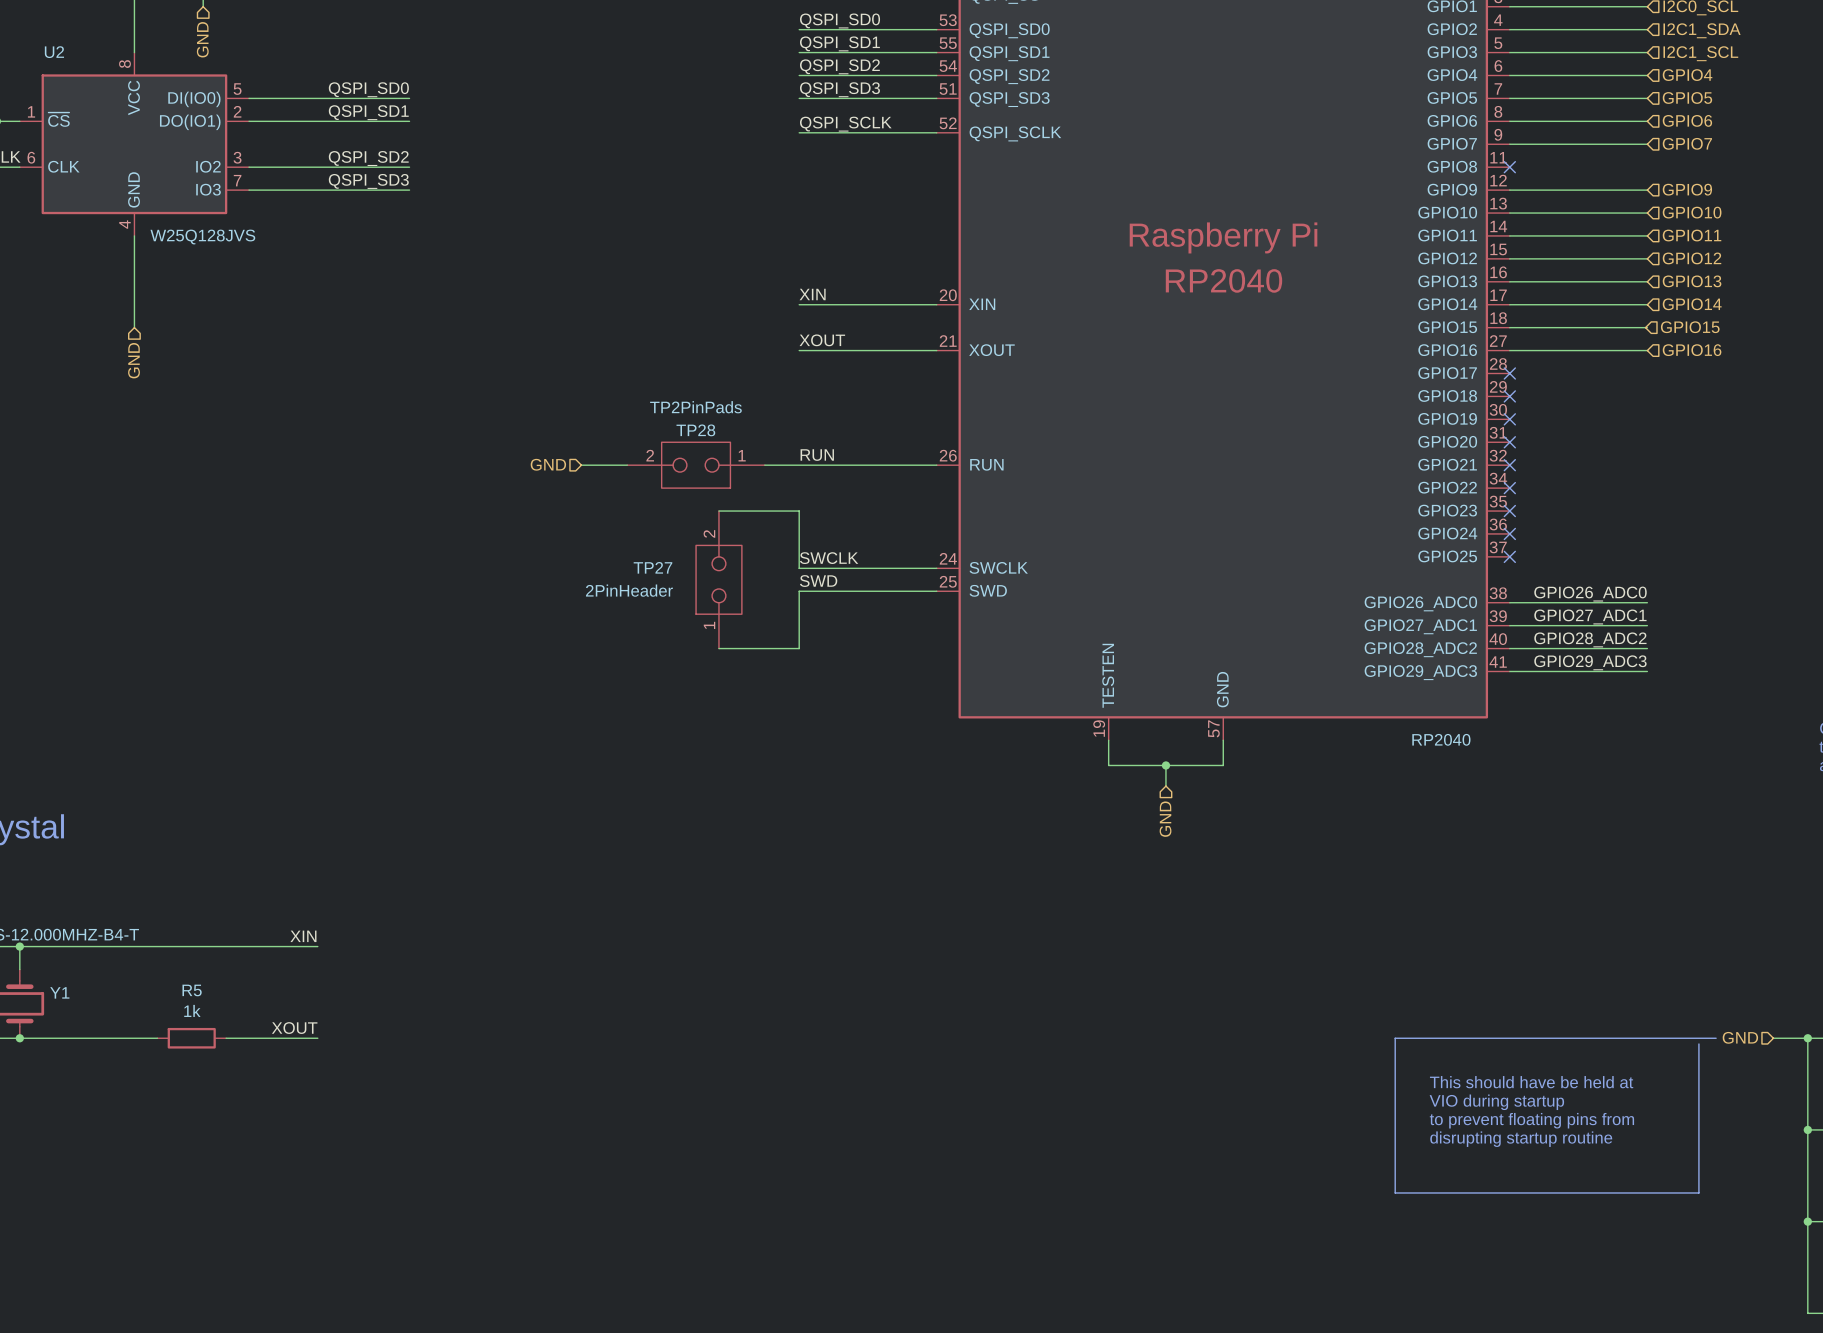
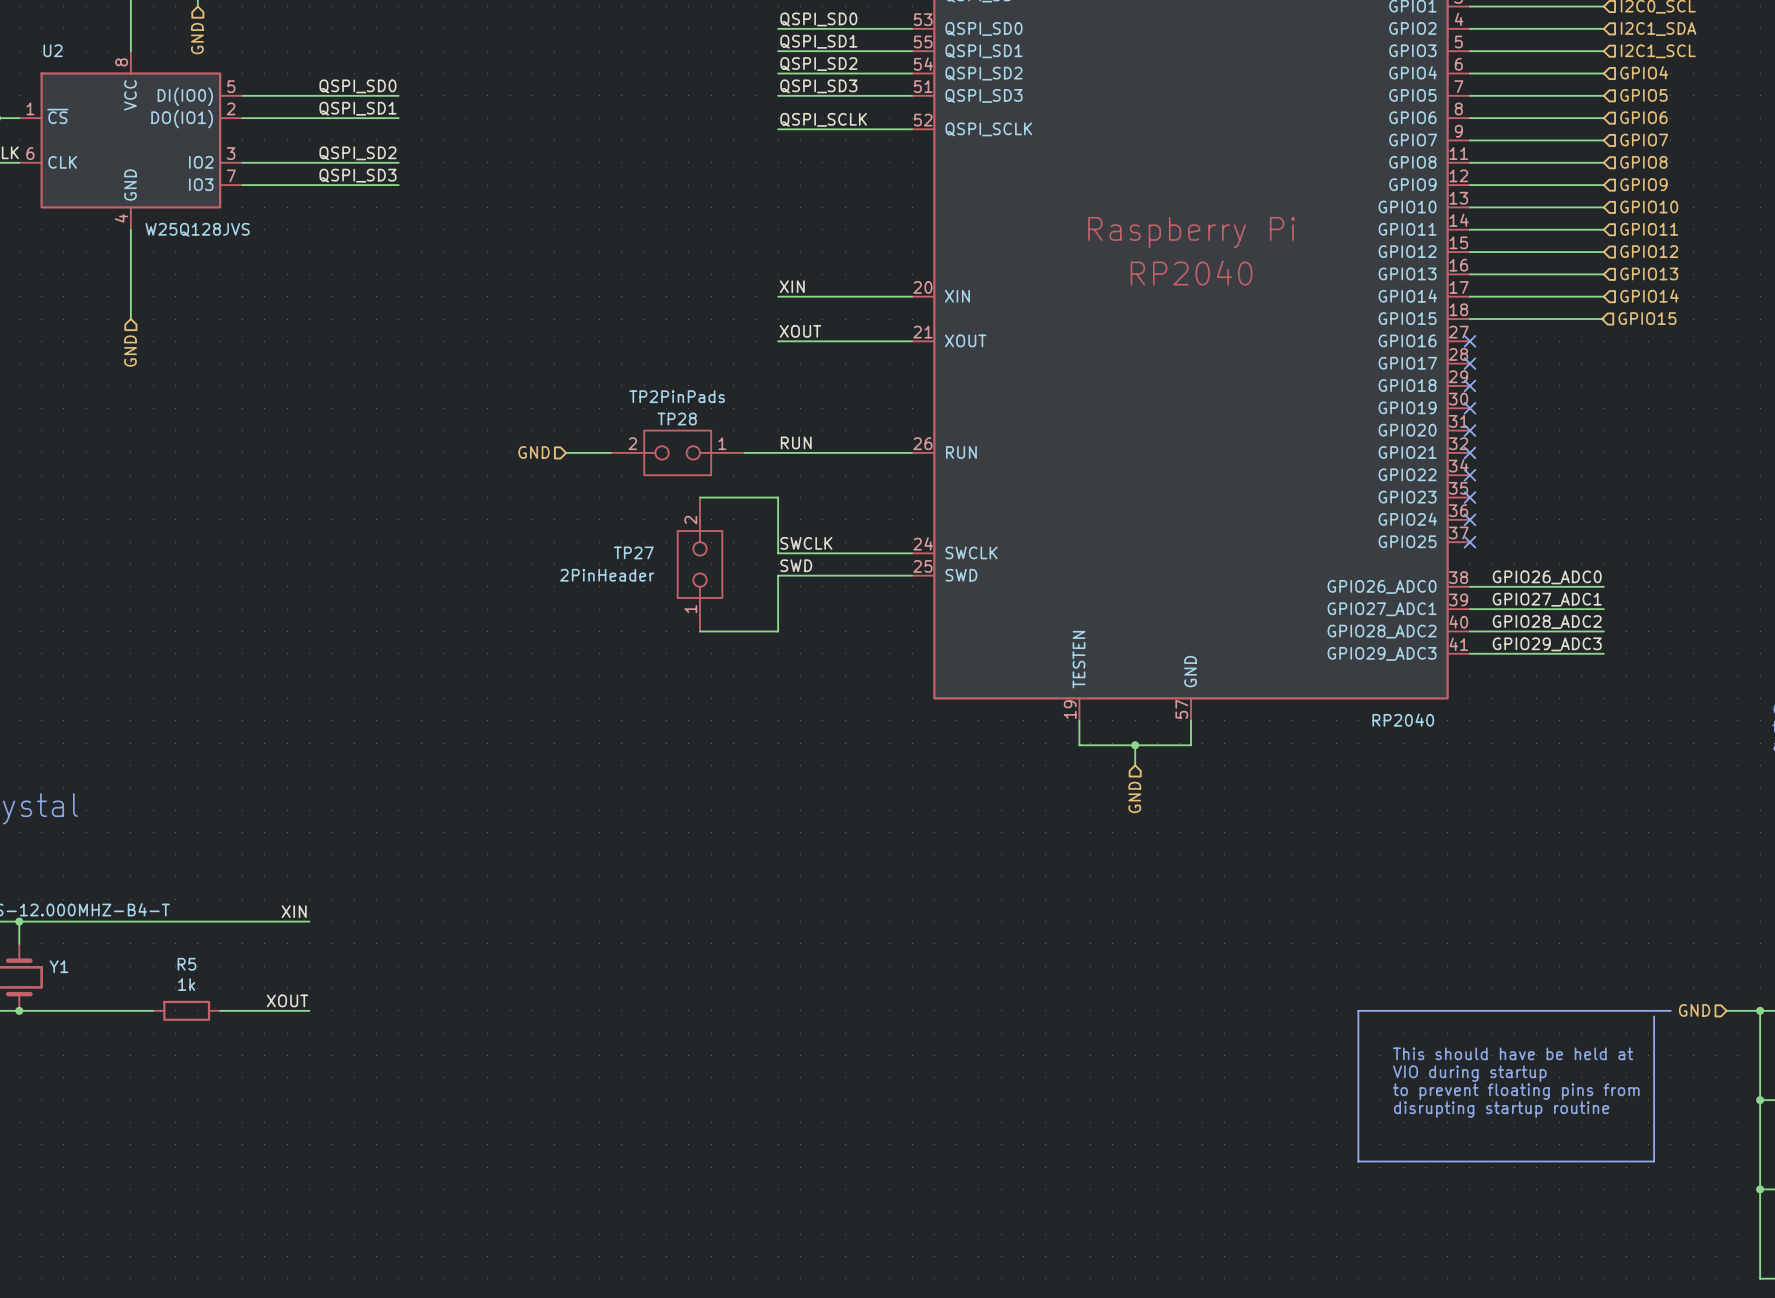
hierarchical label: none -> GPIO8 (1643, 162)
no-connect mark: (1509, 167) -> none
wire: (1509, 350) (1647, 350) -> (1469, 162) (1603, 162)
no-connect mark: none -> (1469, 341)
hierarchical label: GPIO16 (1692, 350) -> none

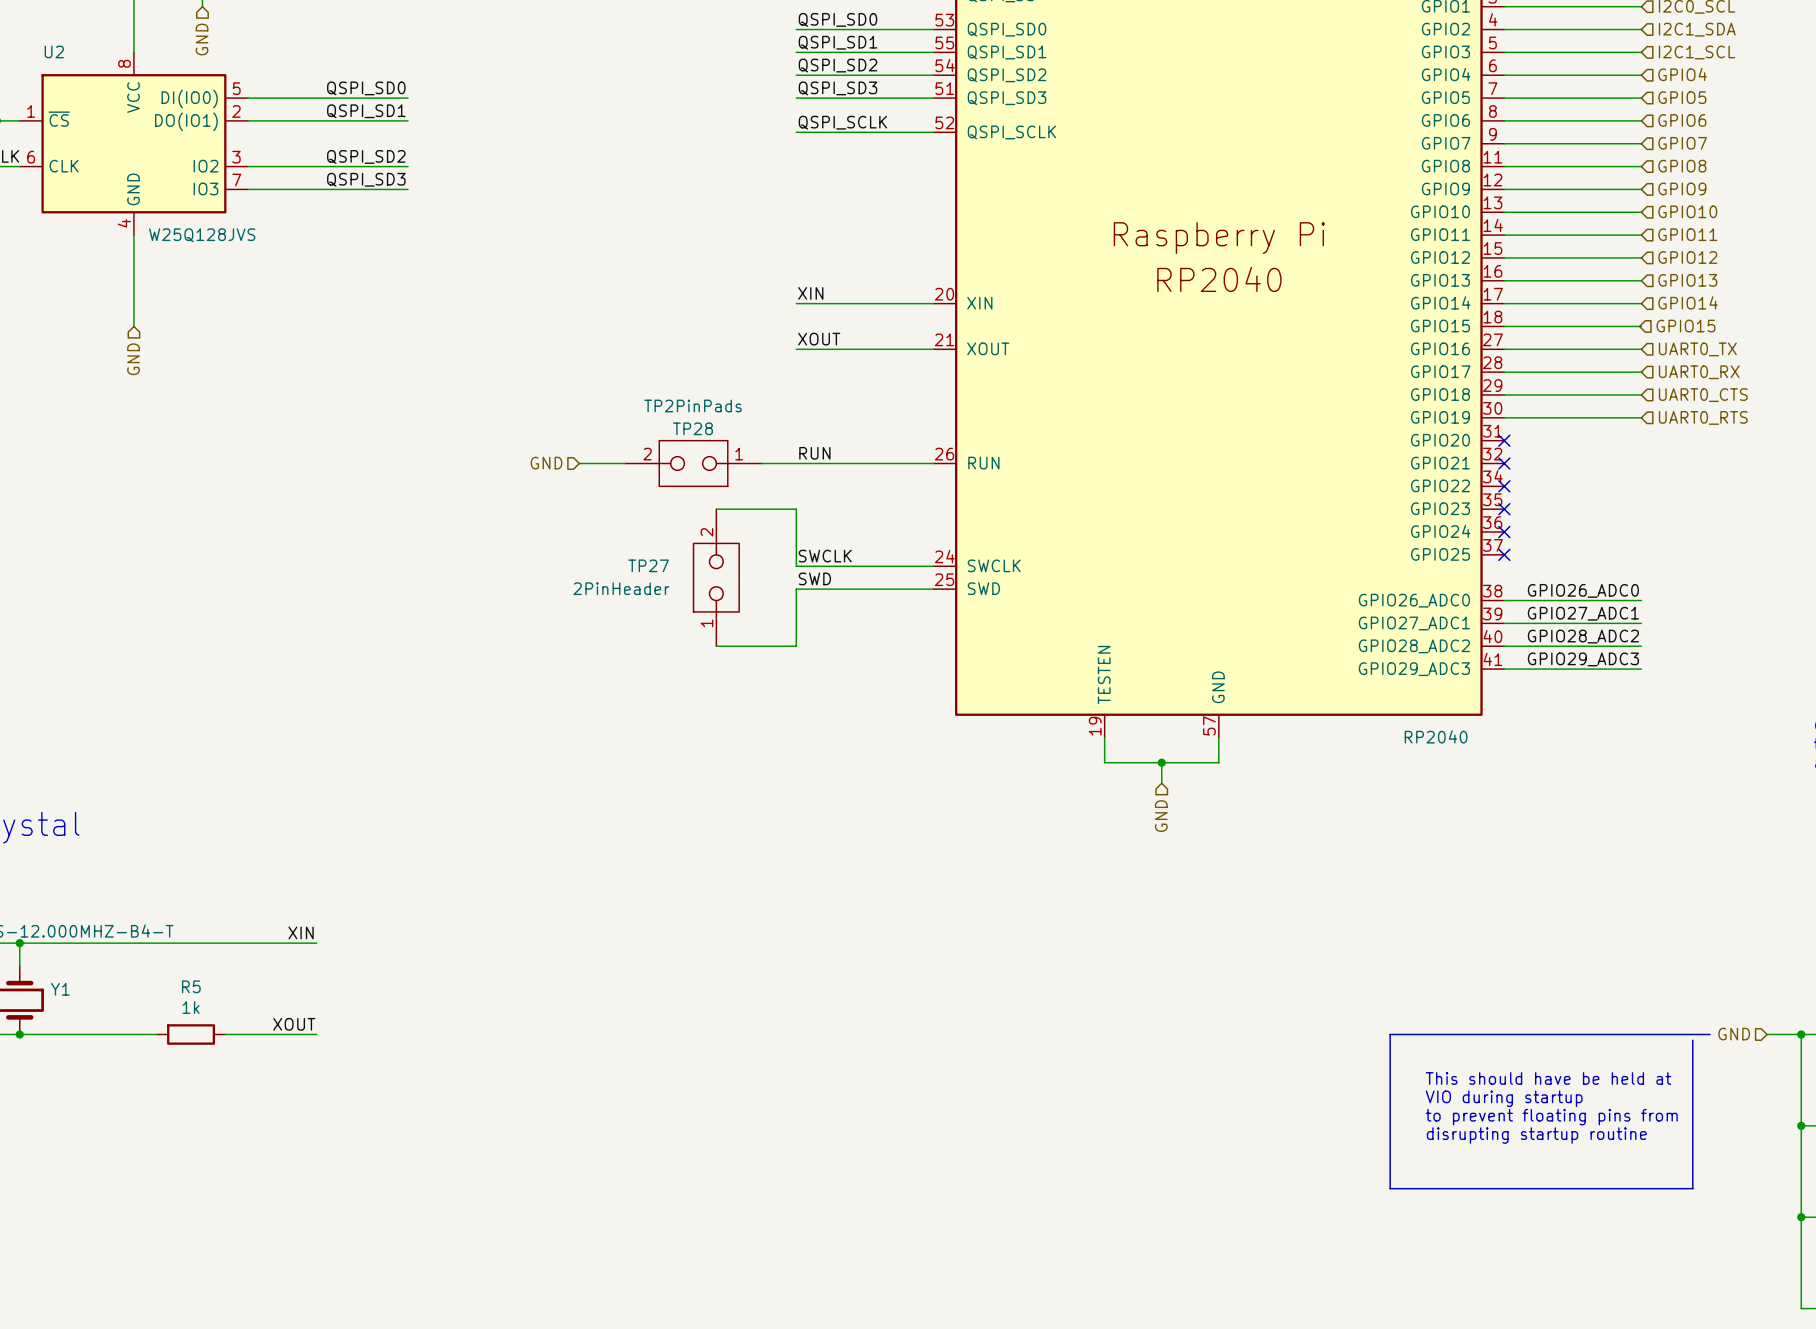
wire: none -> (1504, 349) (1641, 349)
no-connect mark: (1469, 341) -> none
hierarchical label: none -> UART0_TX (1697, 349)
wire: none -> (1504, 372) (1641, 372)
no-connect mark: (1469, 363) -> none
hierarchical label: none -> UART0_RX (1699, 372)
wire: none -> (1504, 394) (1641, 394)
no-connect mark: (1469, 385) -> none
hierarchical label: none -> UART0_CTS (1703, 395)
wire: none -> (1504, 417) (1641, 417)
no-connect mark: (1469, 408) -> none
hierarchical label: none -> UART0_RTS (1703, 417)

